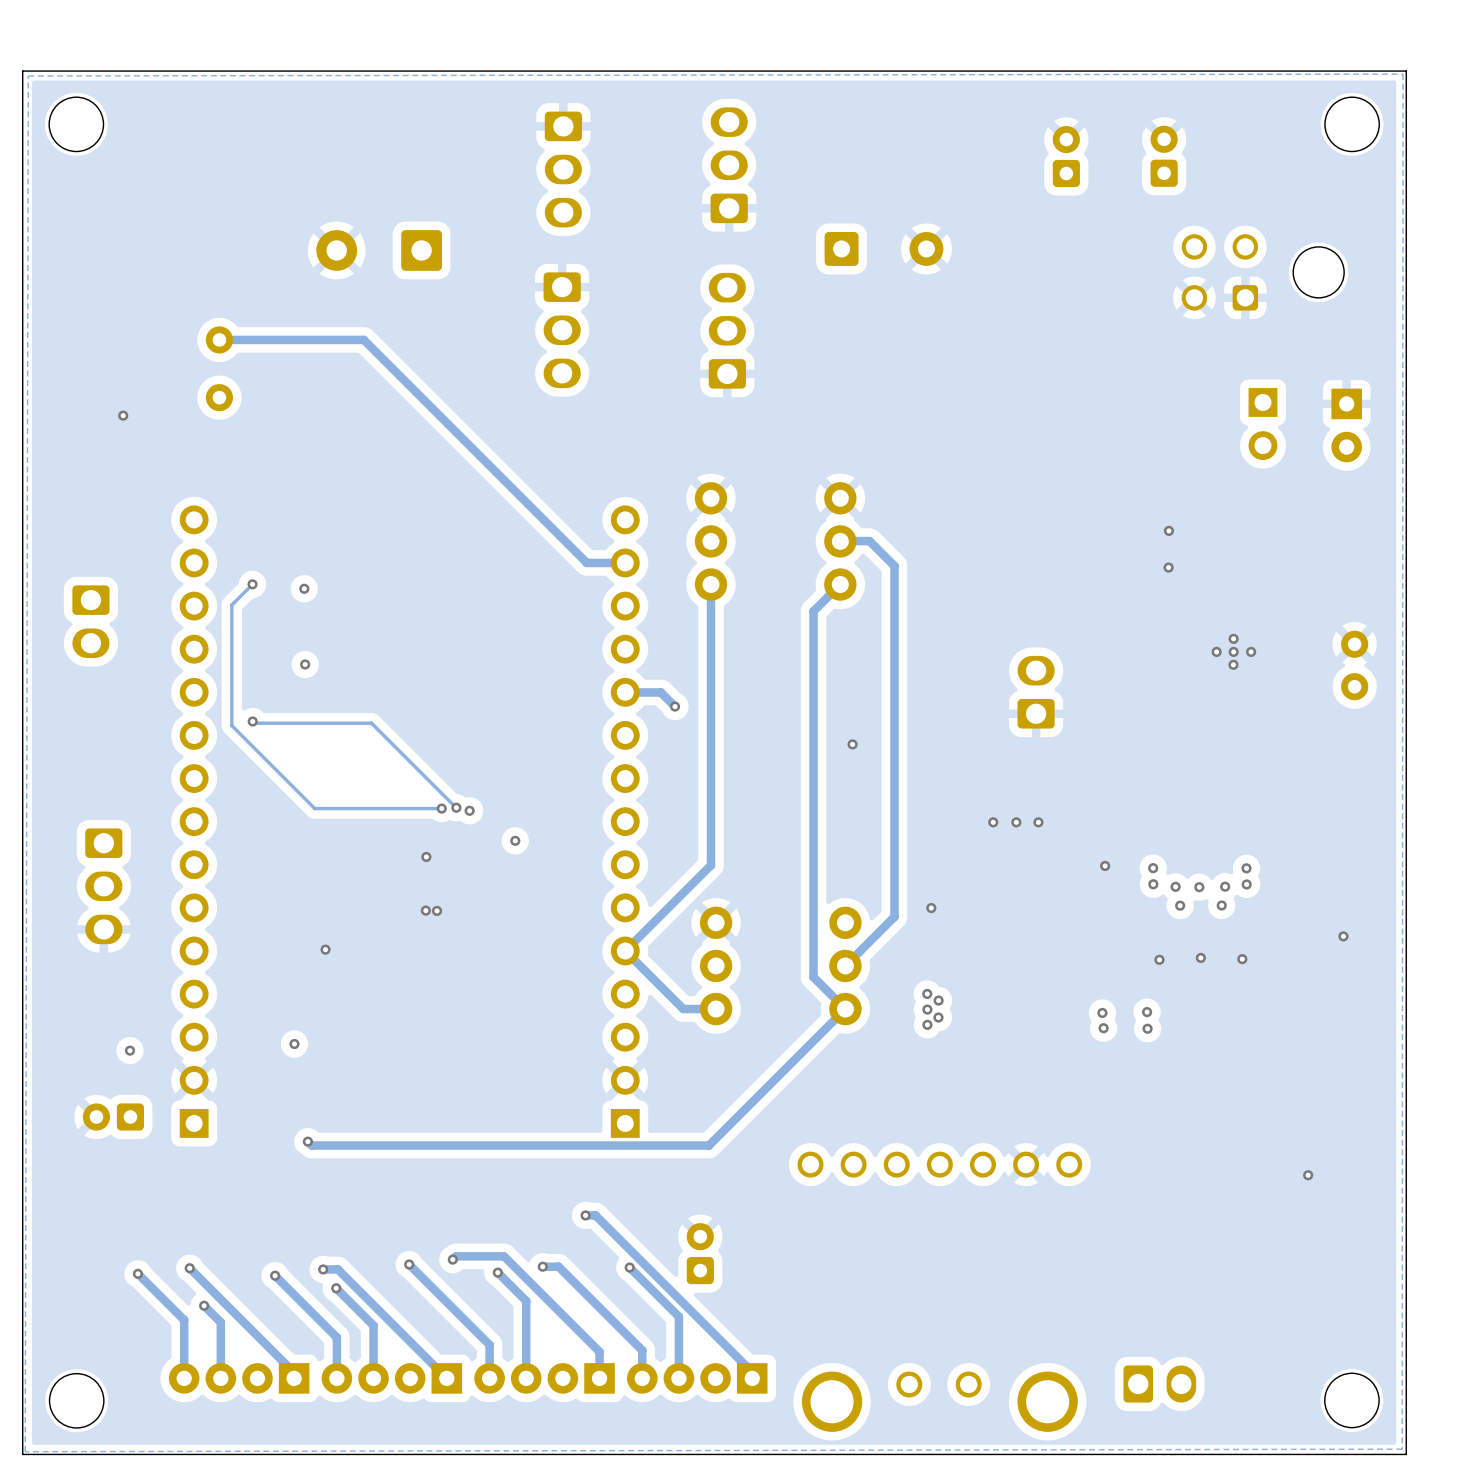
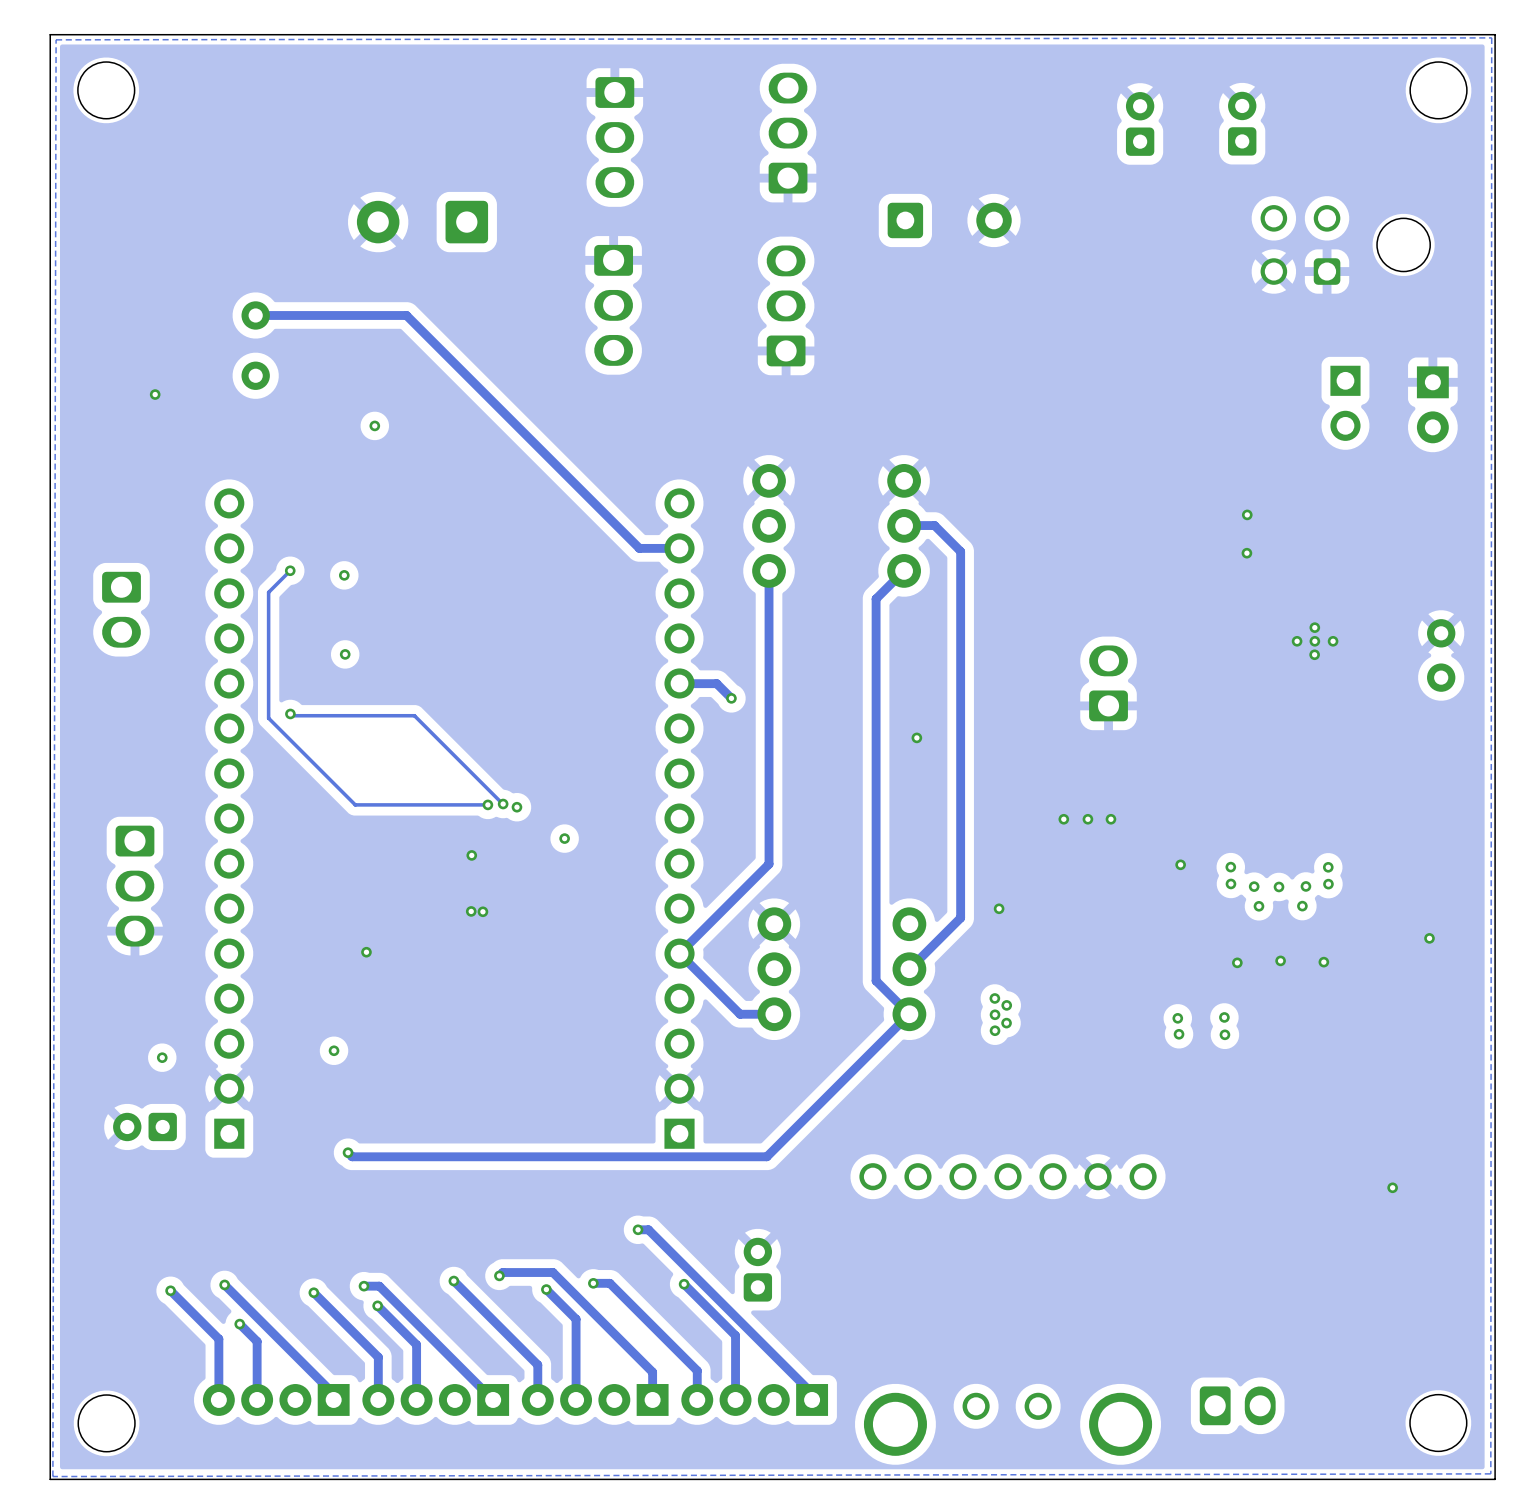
via: none -> (374, 425)

